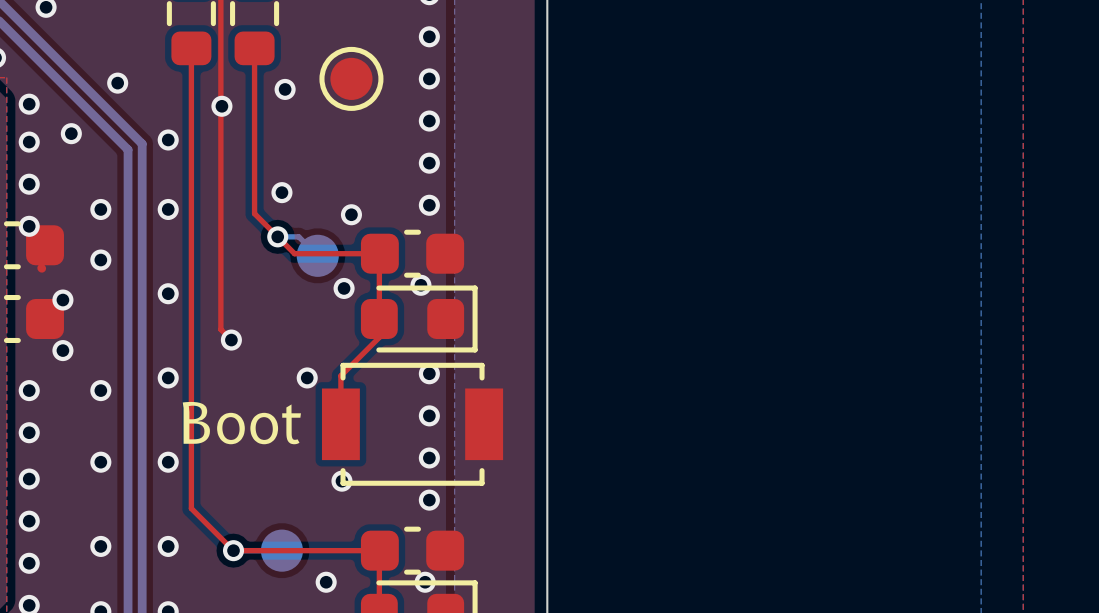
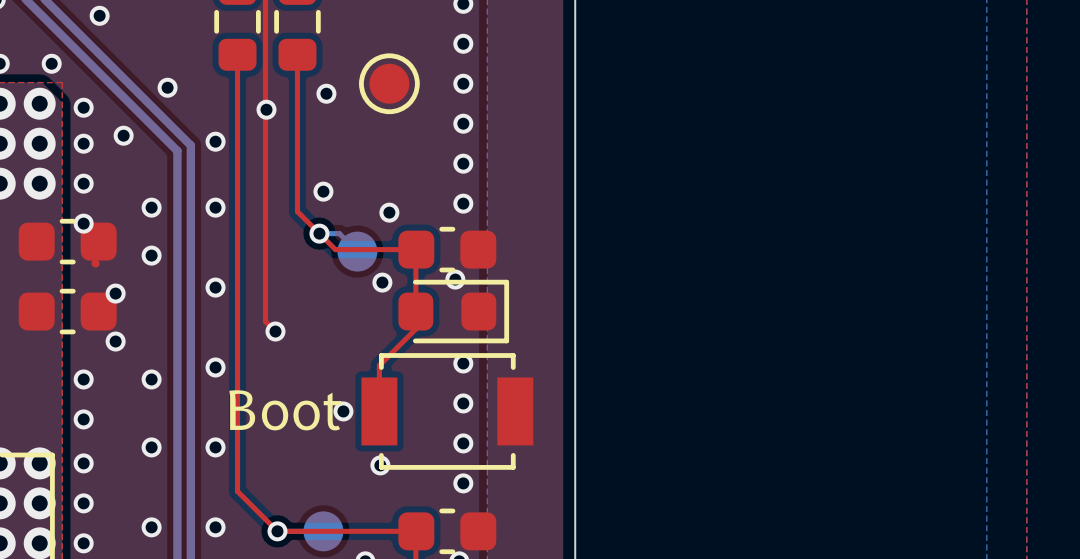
via position: (307, 377) -> (343, 411)

